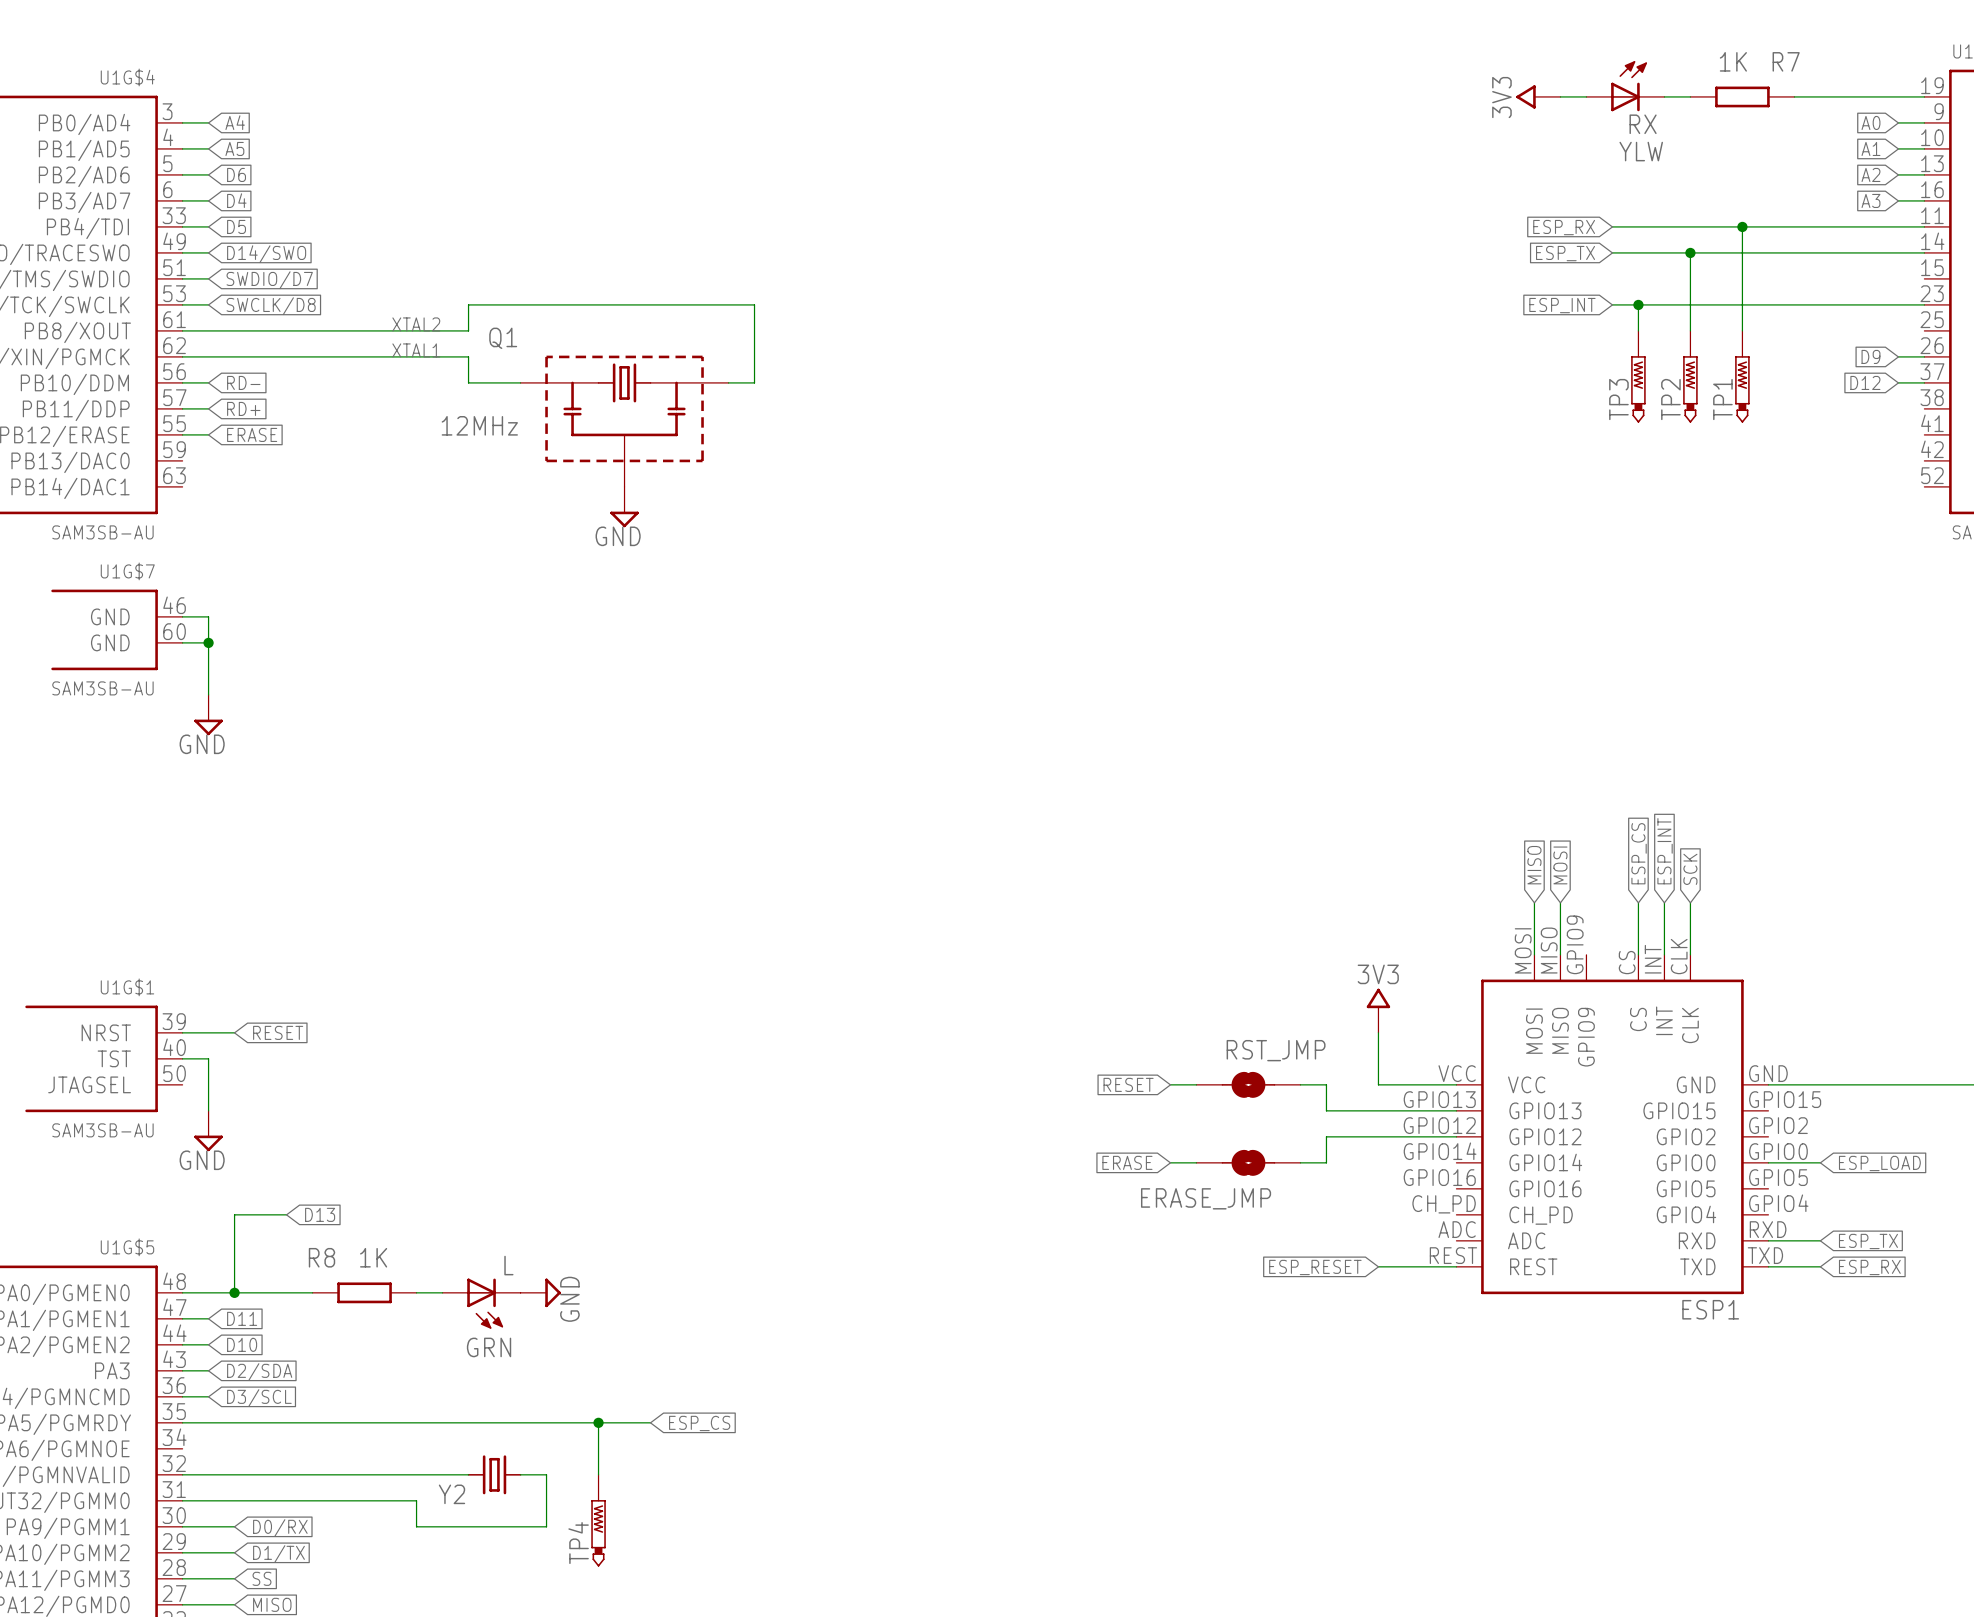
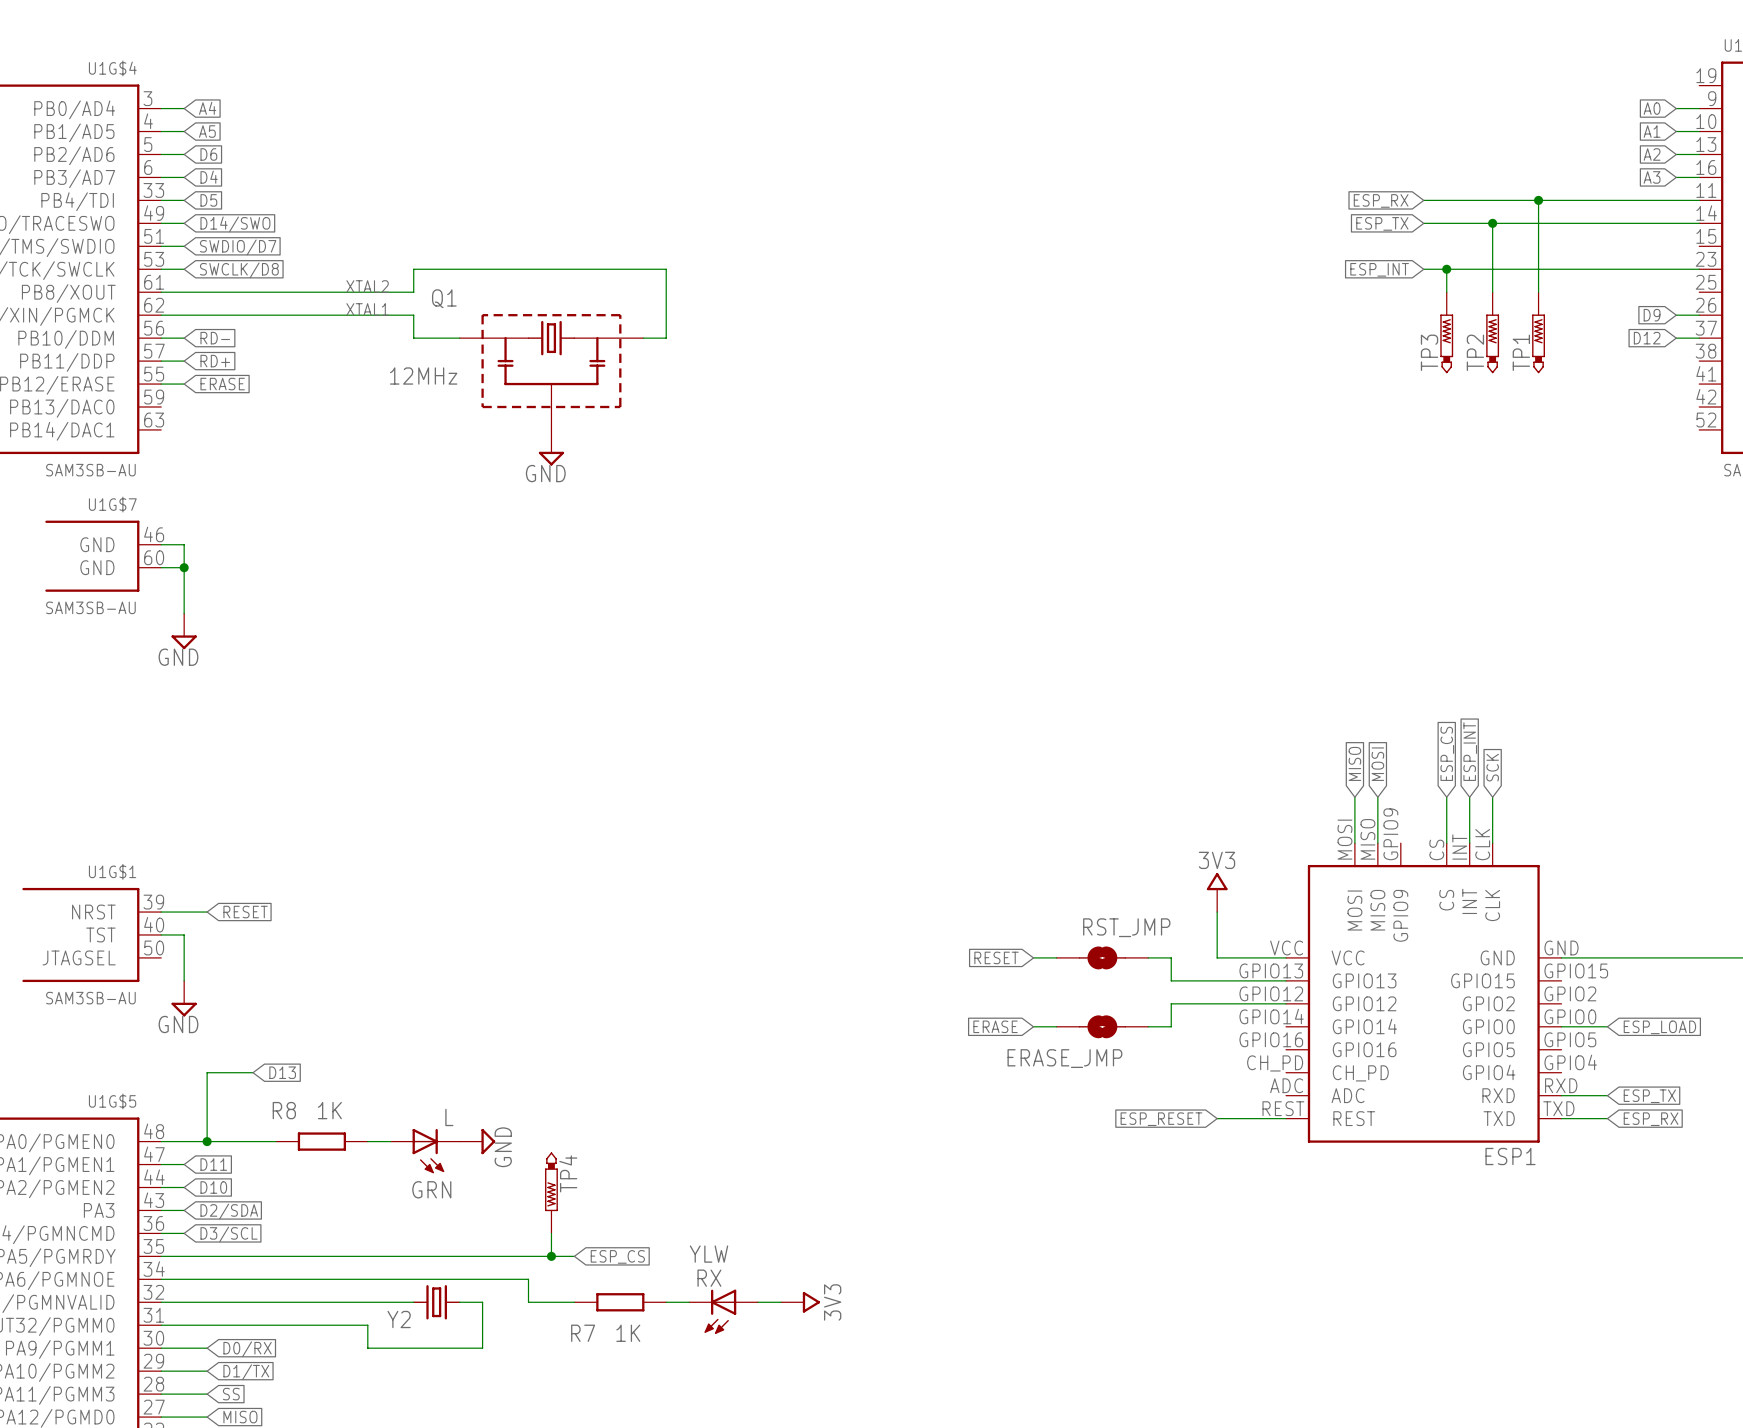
R7 value position: 1K (1733, 61) -> 1K (628, 1333)
R7 name position: R7 (1786, 61) -> R7 (583, 1333)
RX: YLW (1625, 86) -> none
power symbol: 3V3 (1538, 96) -> none
wire: (1560, 96) (1586, 96) -> none
wire: (1664, 96) (1690, 96) -> none
R7 position: (1742, 96) -> (620, 1302)
wire: (1794, 96) (1924, 96) -> none
wire: none -> (551, 1233) (551, 1256)
wire: (598, 1422) (598, 1448) -> (161, 1279) (528, 1279)
junction position: (598, 1422) -> (551, 1256)
wire: none -> (528, 1302) (574, 1302)
wire: none -> (666, 1302) (689, 1302)
wire: none -> (758, 1302) (781, 1302)
power symbol: none -> 3V3 (800, 1302)
RX: none -> YLW (723, 1311)
TP4 position: (598, 1520) -> (551, 1192)
TP4 rotation: 0° (598, 1533) -> 180° (551, 1181)

